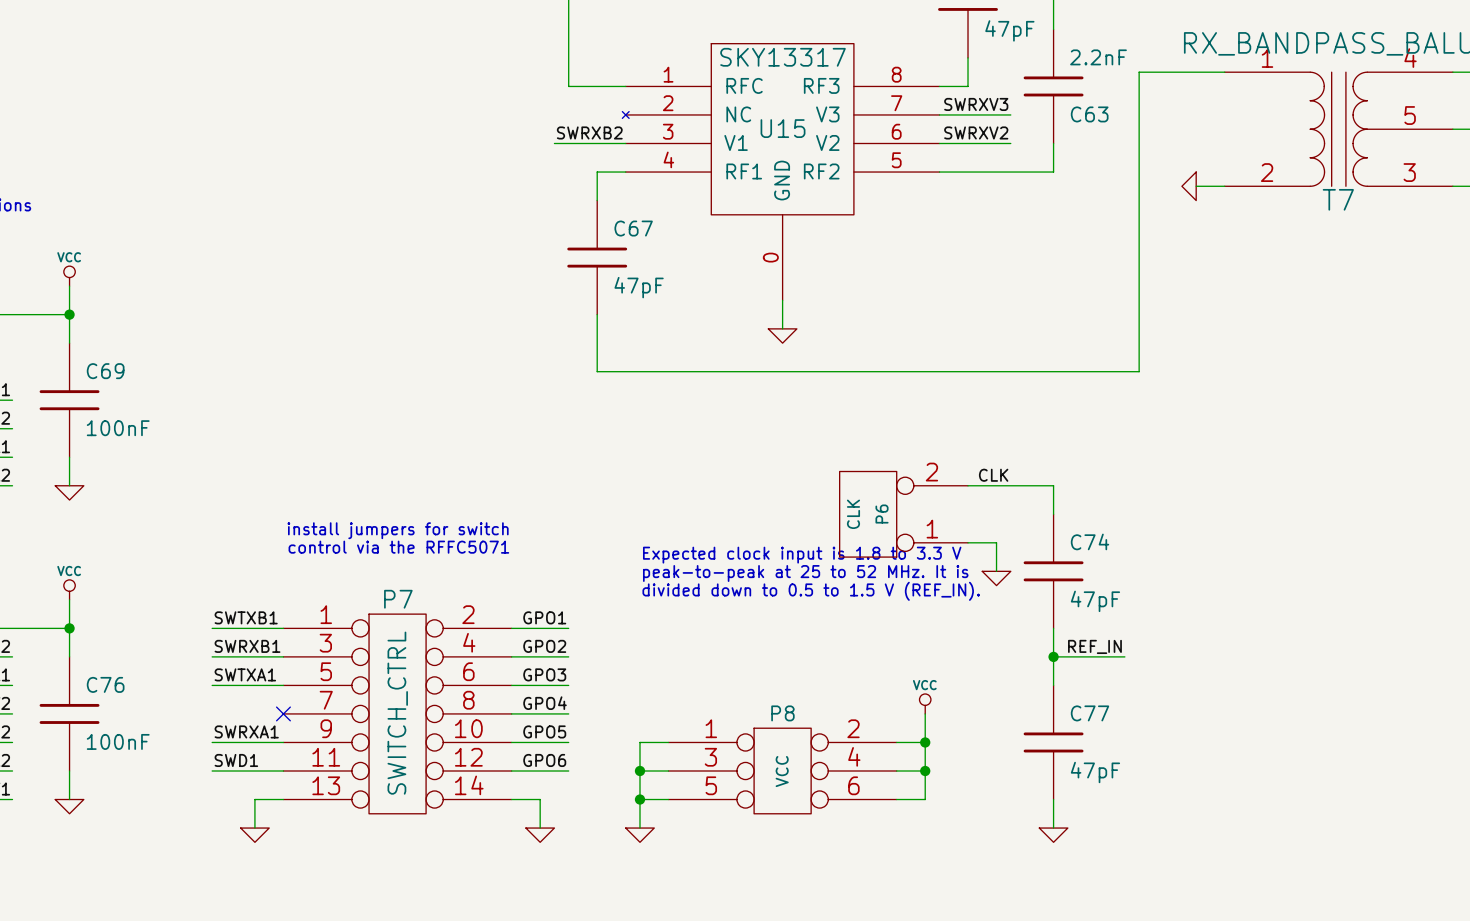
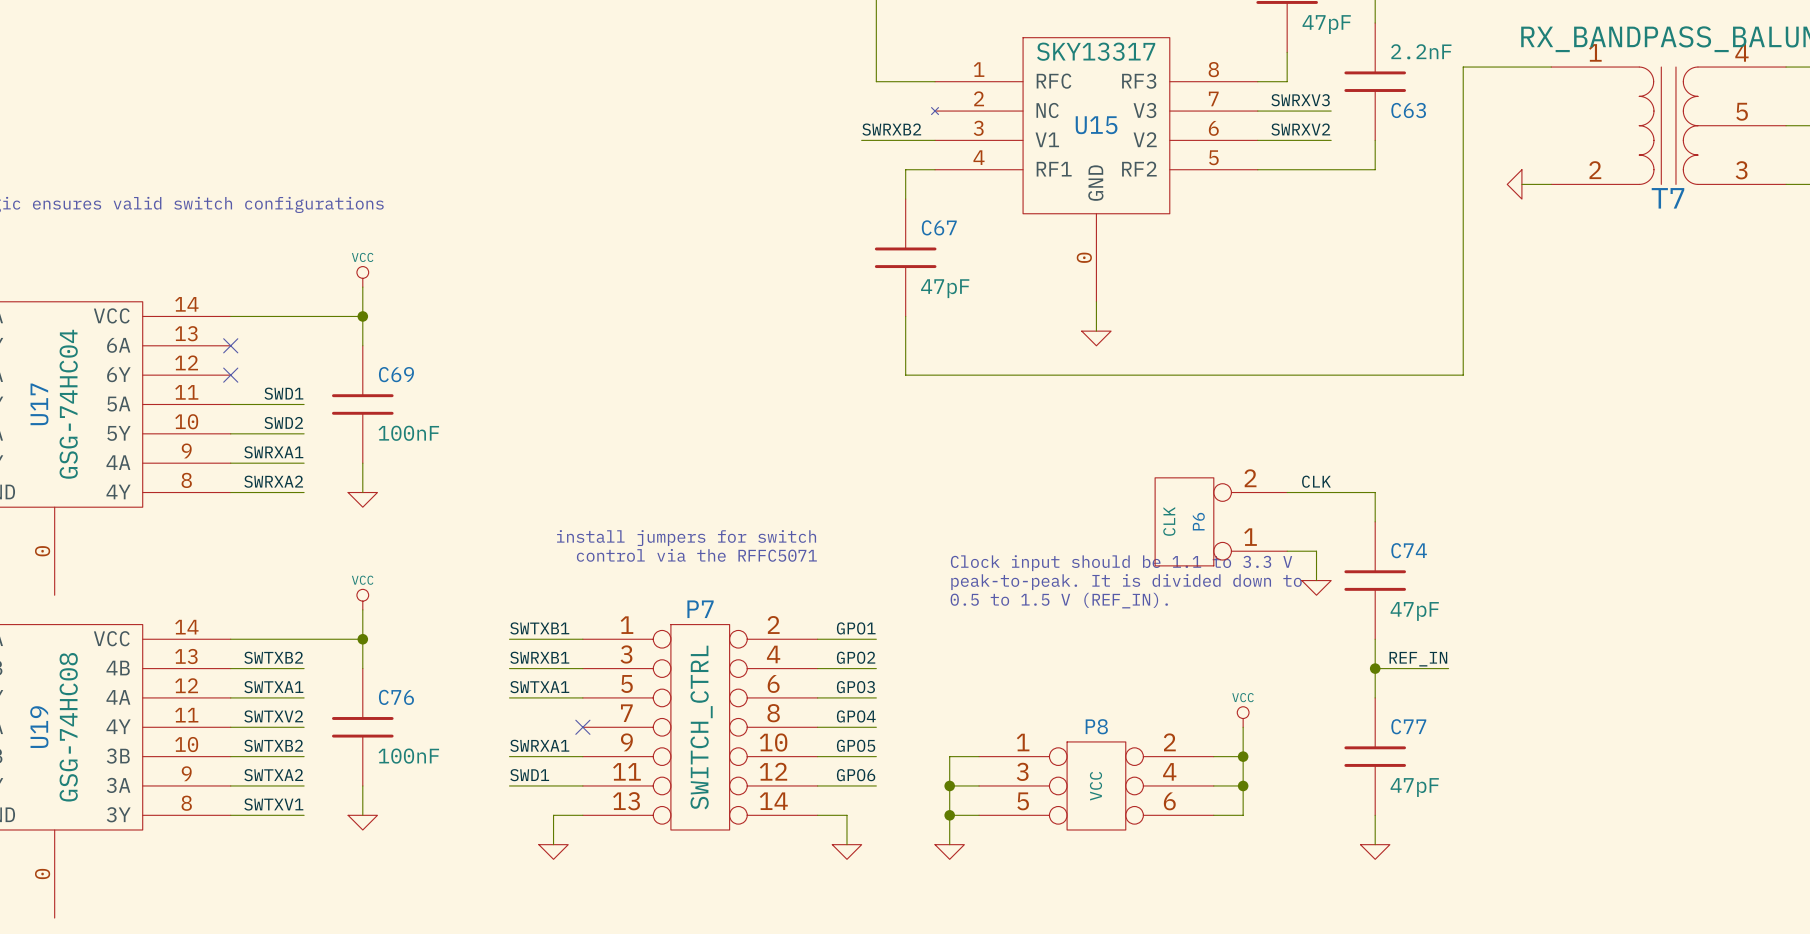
text: Expected clock input is 1.8 to 3.3 V (802, 555) -> Clock input should be 1.1 to 3.3 V (1121, 563)
text: peak-to-peak at 25 to 52 MHz. It is (805, 573) -> peak-to-peak. It is divided down to (1126, 582)
text: divided down to 0.5 to 1.5 V (REF_IN). (811, 591) -> 0.5 to 1.5 V (REF_IN). (1059, 600)

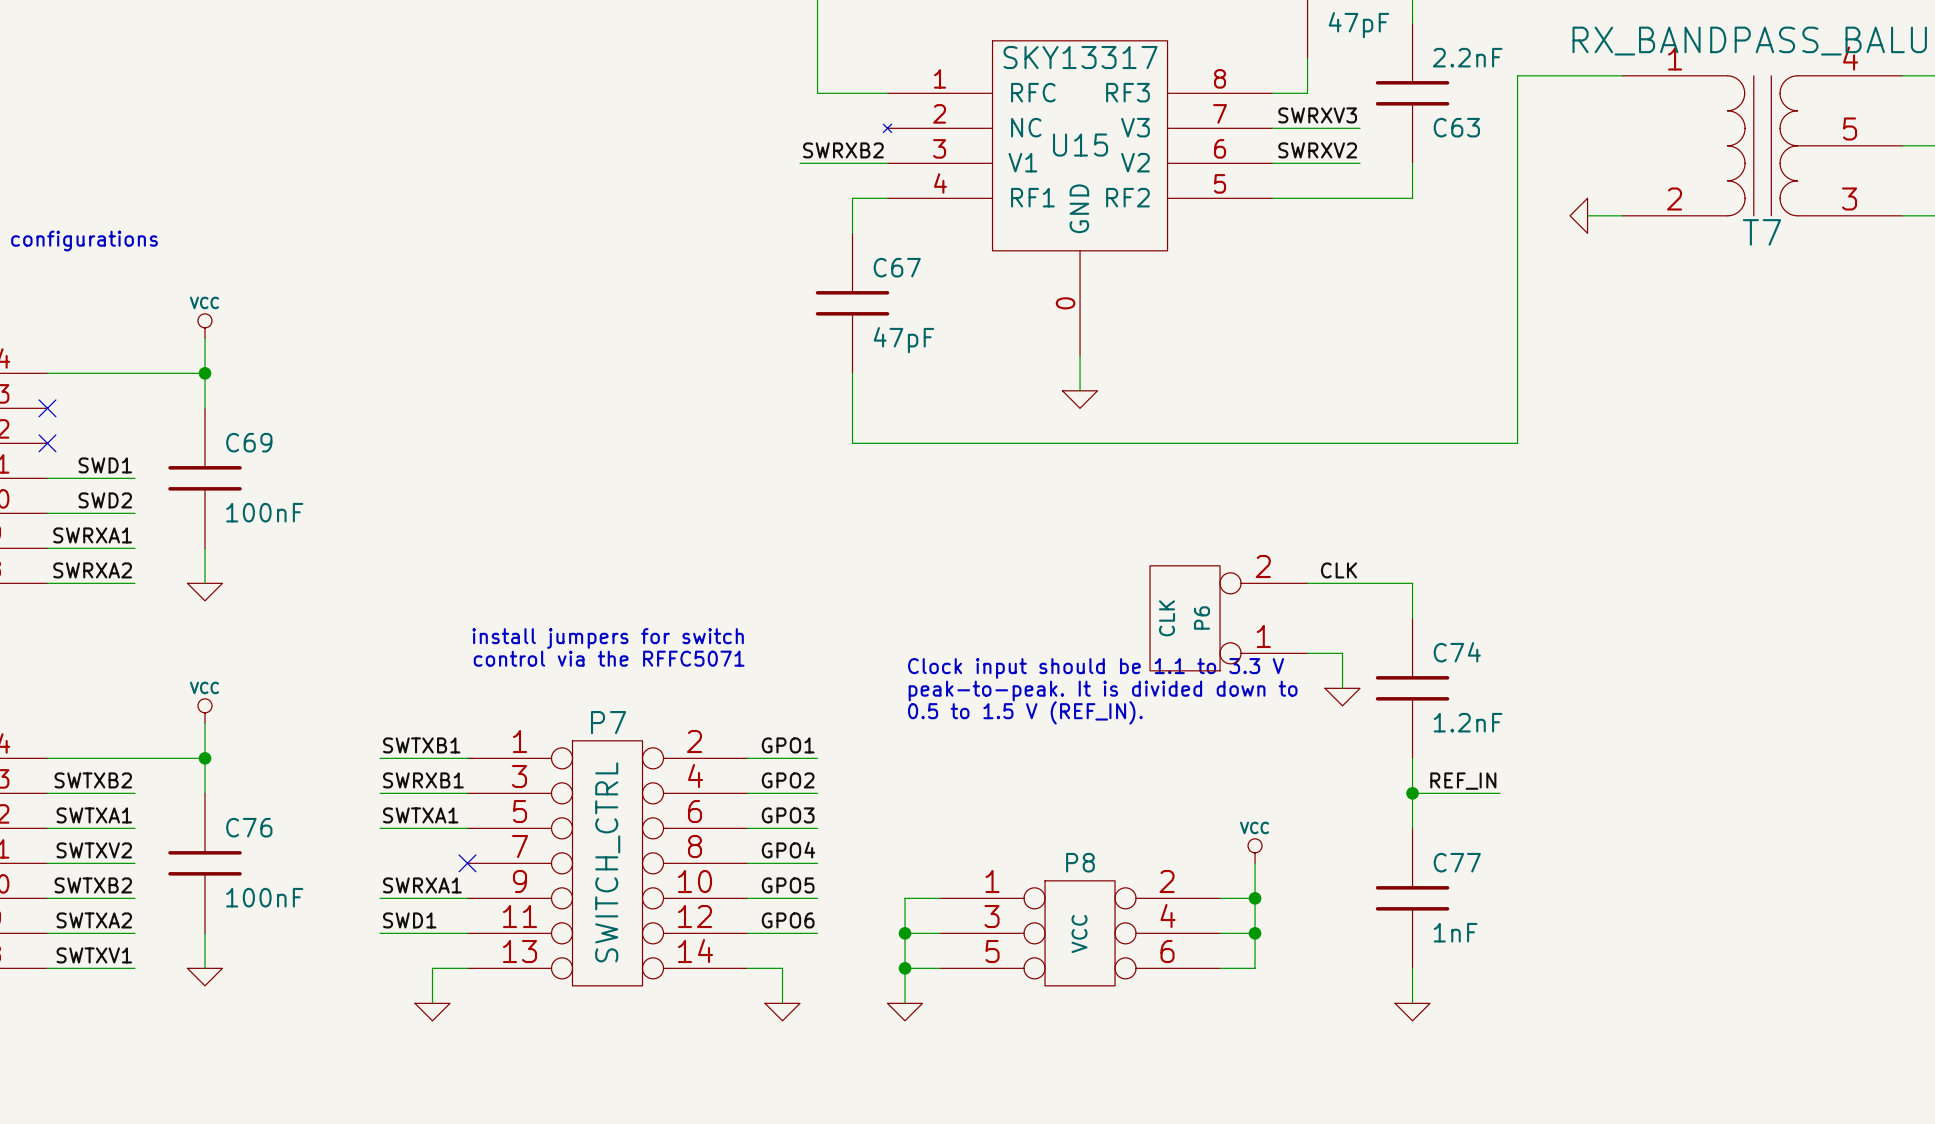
C74 value: 47pF (1414, 611) -> 1.2nF (1468, 722)
C77 value: 47pF (1414, 787) -> 1nF (1455, 932)

